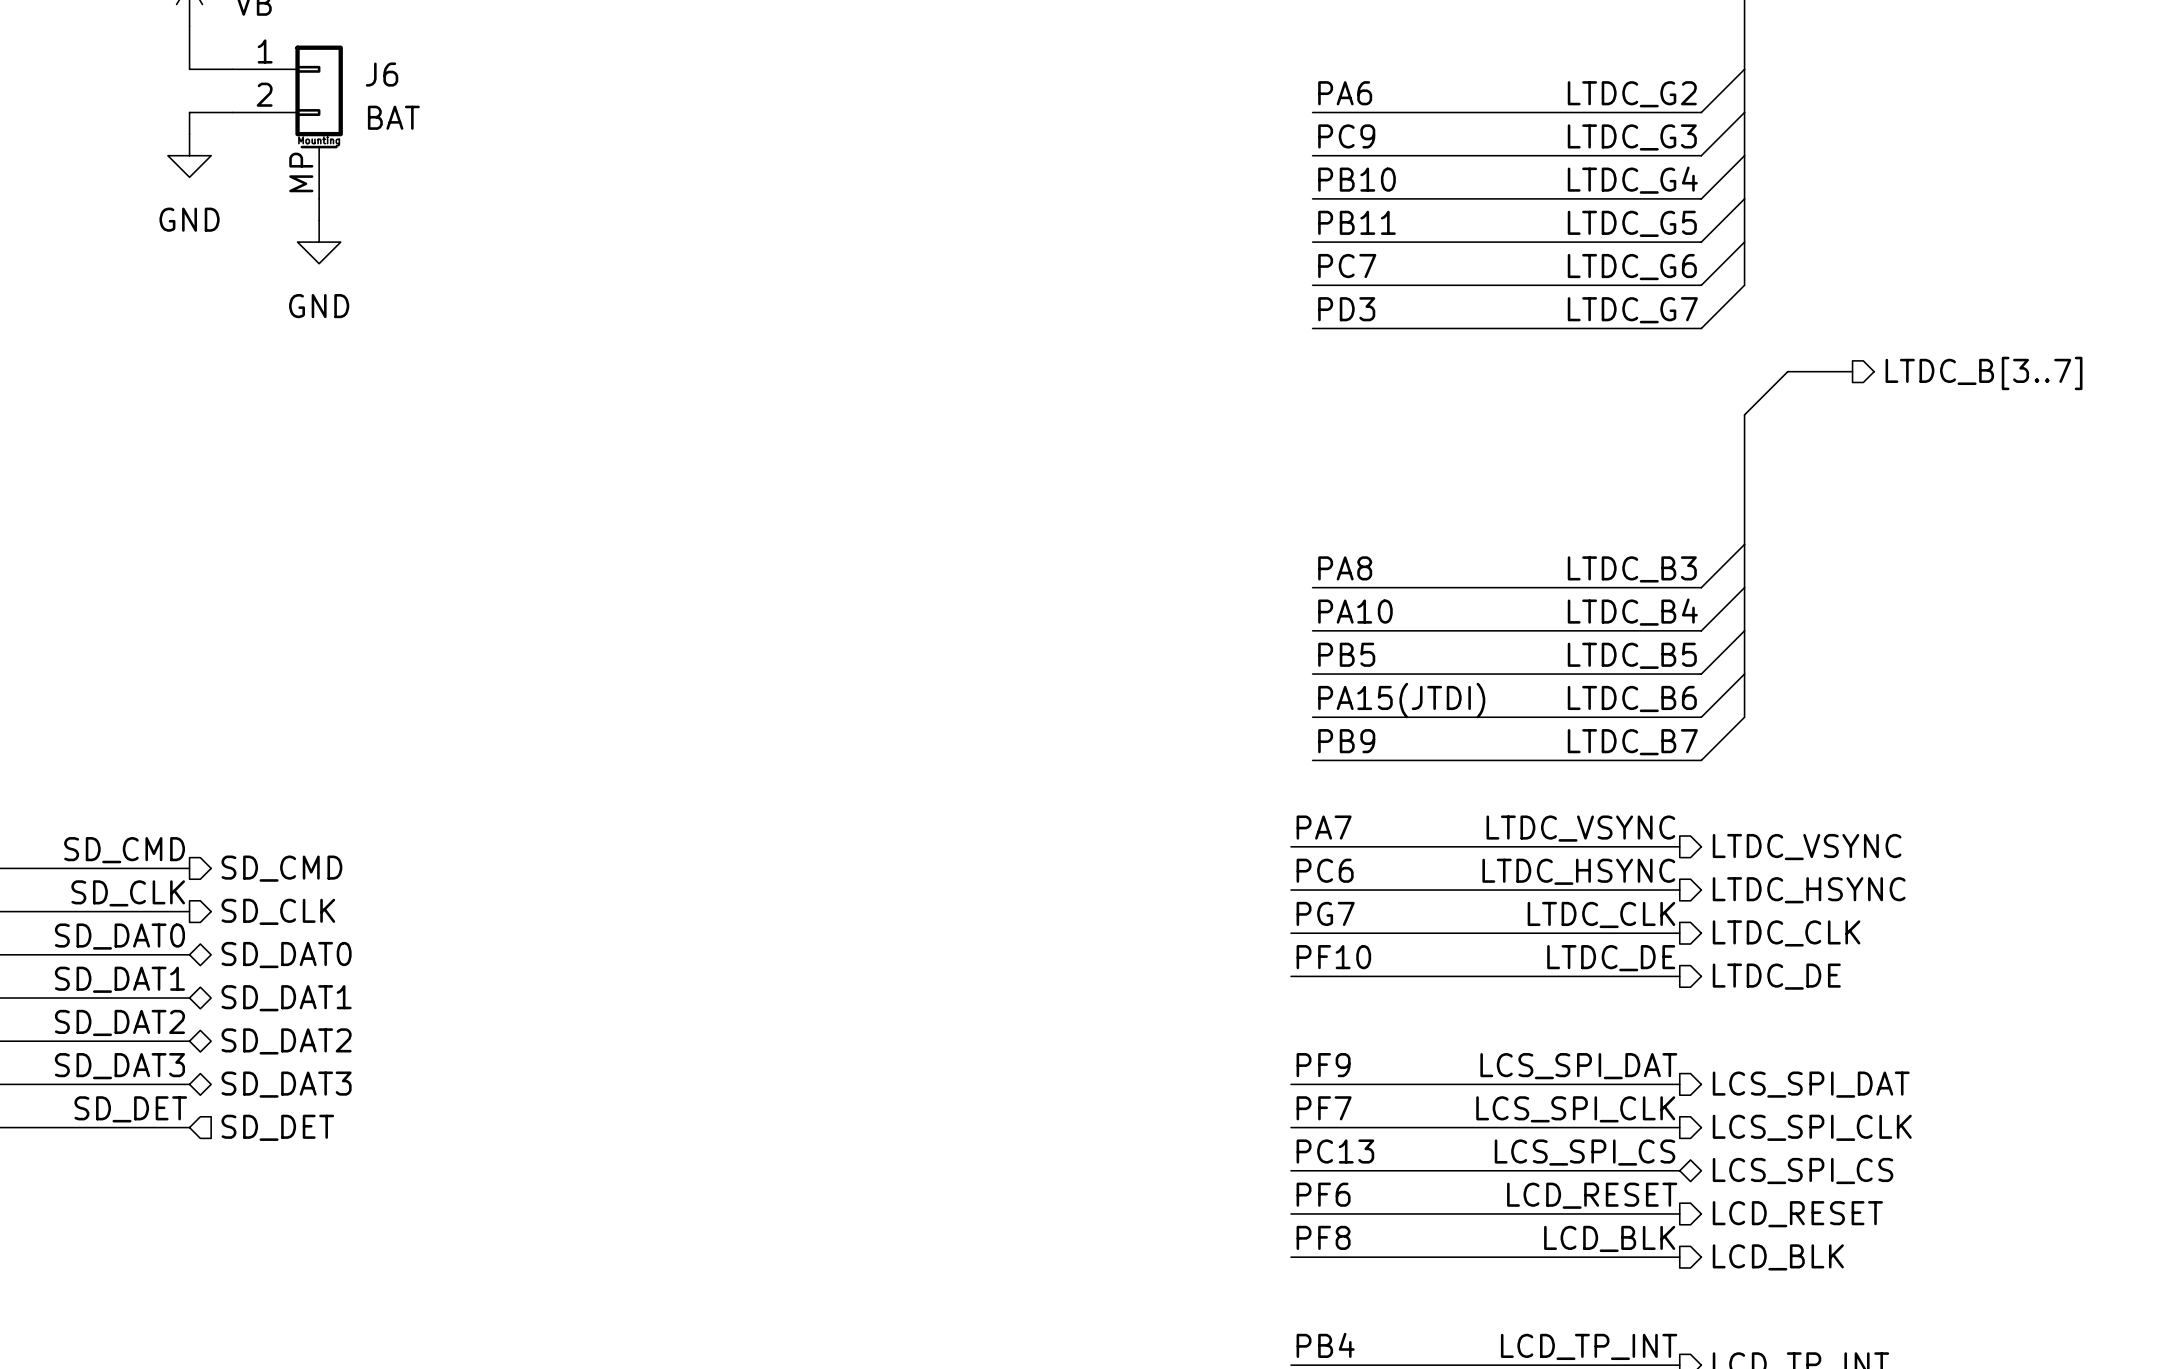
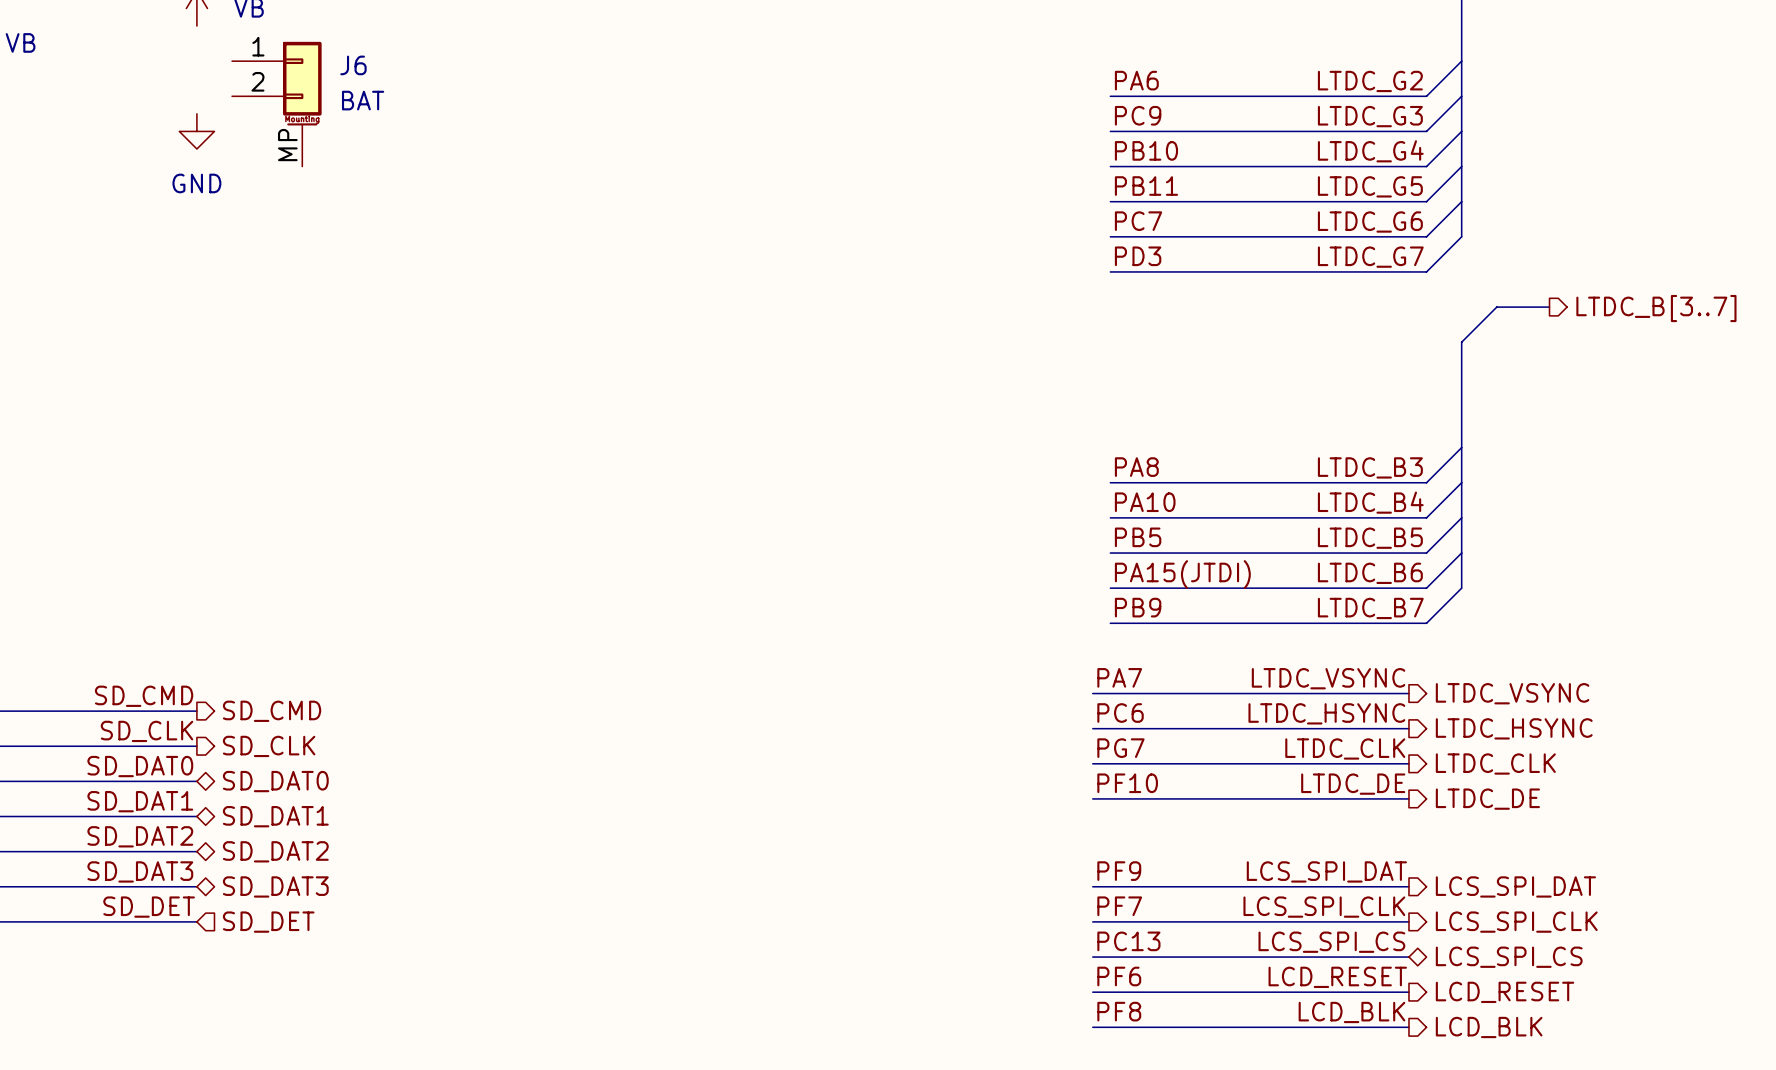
wire: (189, 26) (189, 69) (232, 69) -> none
wire: (232, 112) (189, 112) (189, 134) -> none
wire: (319, 198) (319, 220) -> none
power symbol: GND (319, 242) -> none

